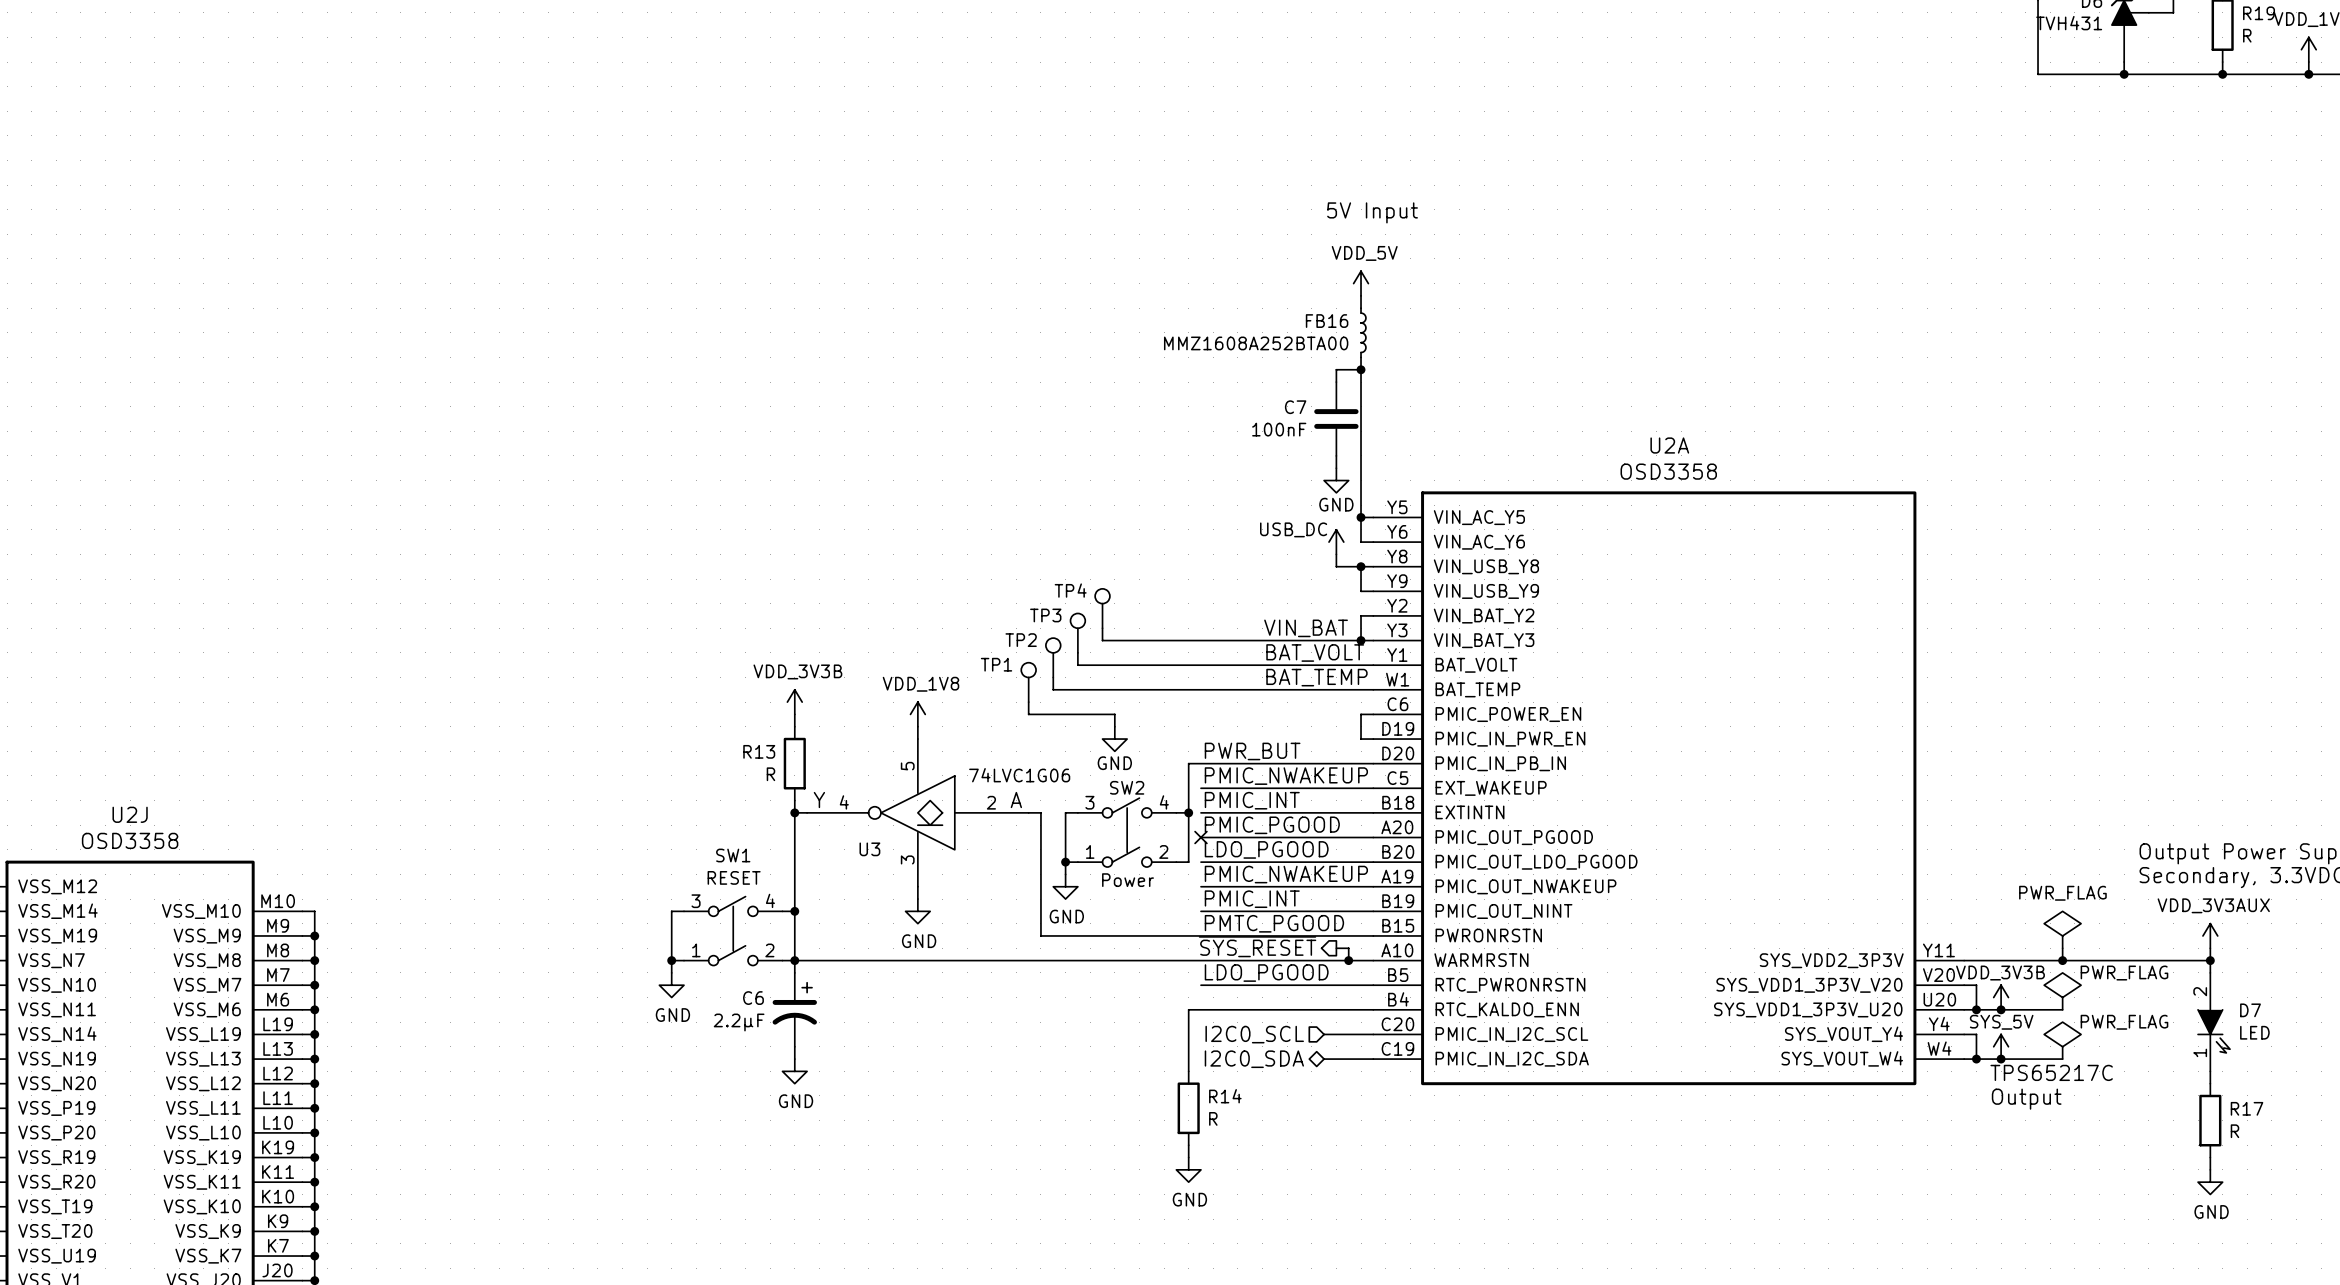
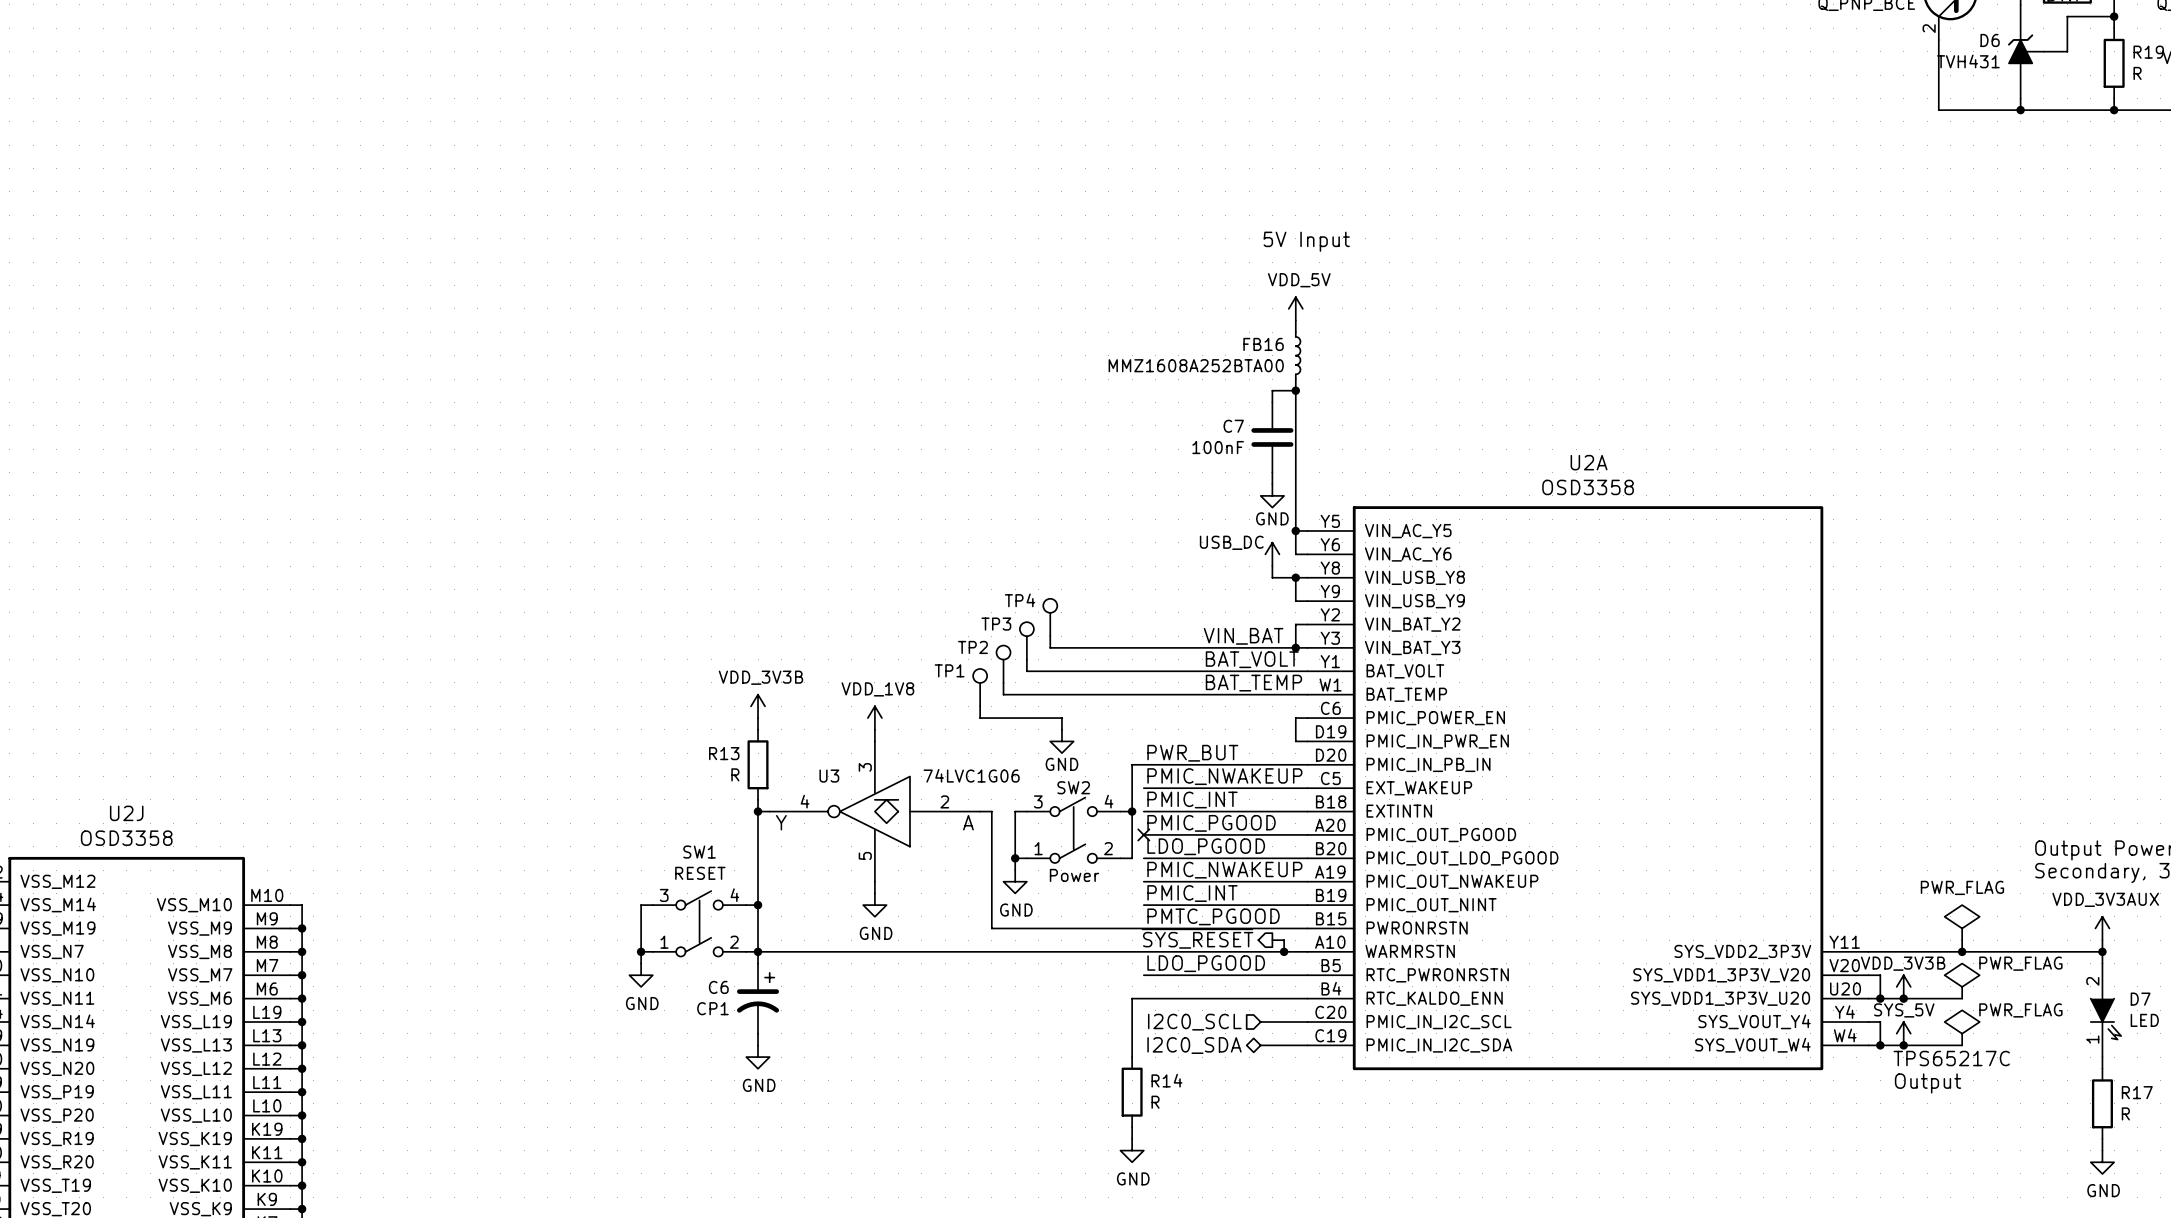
U3 flip: as is (917, 812) -> up-down (874, 811)
C6 value: 2.2μF (739, 1022) -> CP1 (712, 1008)

